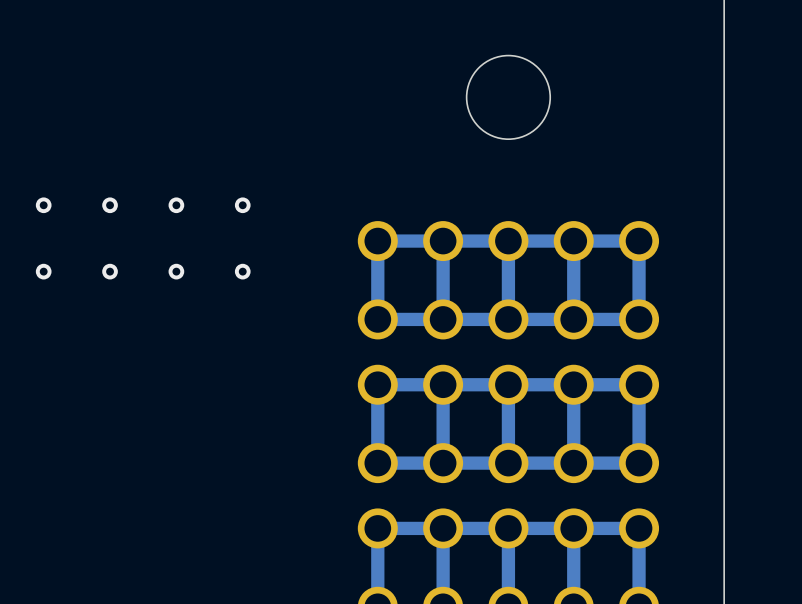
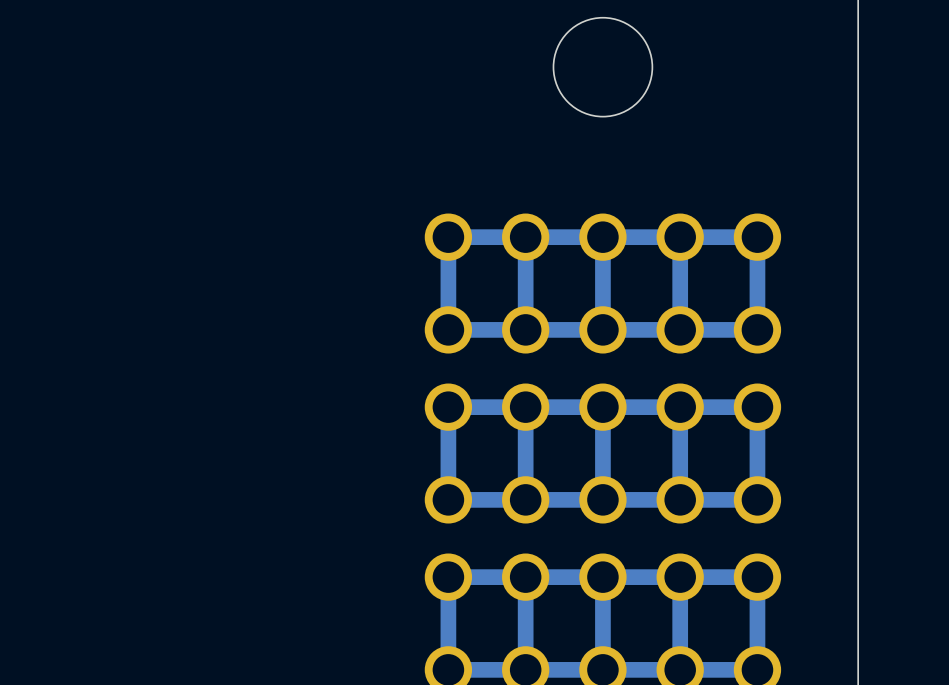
via: (43, 205) -> none
via: (110, 205) -> none
via: (176, 205) -> none
via: (242, 205) -> none
via: (43, 271) -> none
via: (110, 271) -> none
via: (176, 271) -> none
via: (242, 271) -> none

